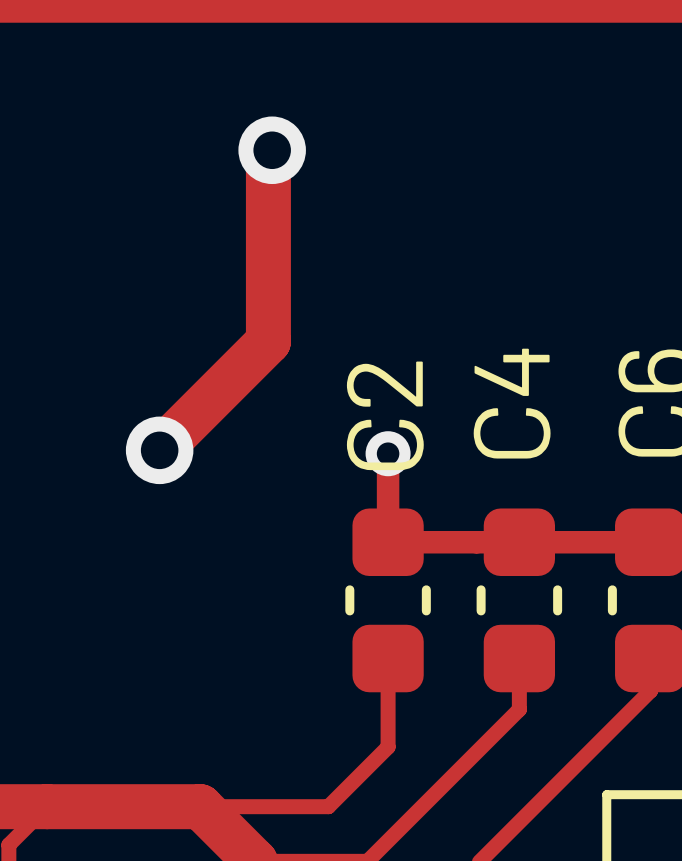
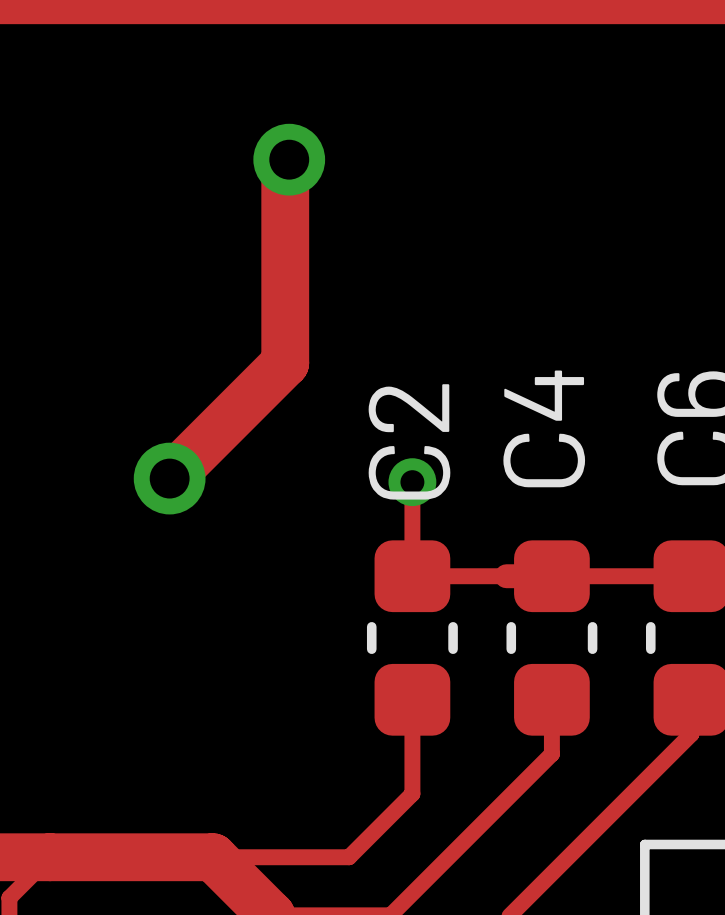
track width: thick (388, 453) (388, 542) (476, 542) -> thin (412, 482) (412, 576) (506, 576)
track width: thick (519, 542) (650, 542) -> thin (551, 576) (691, 576)

